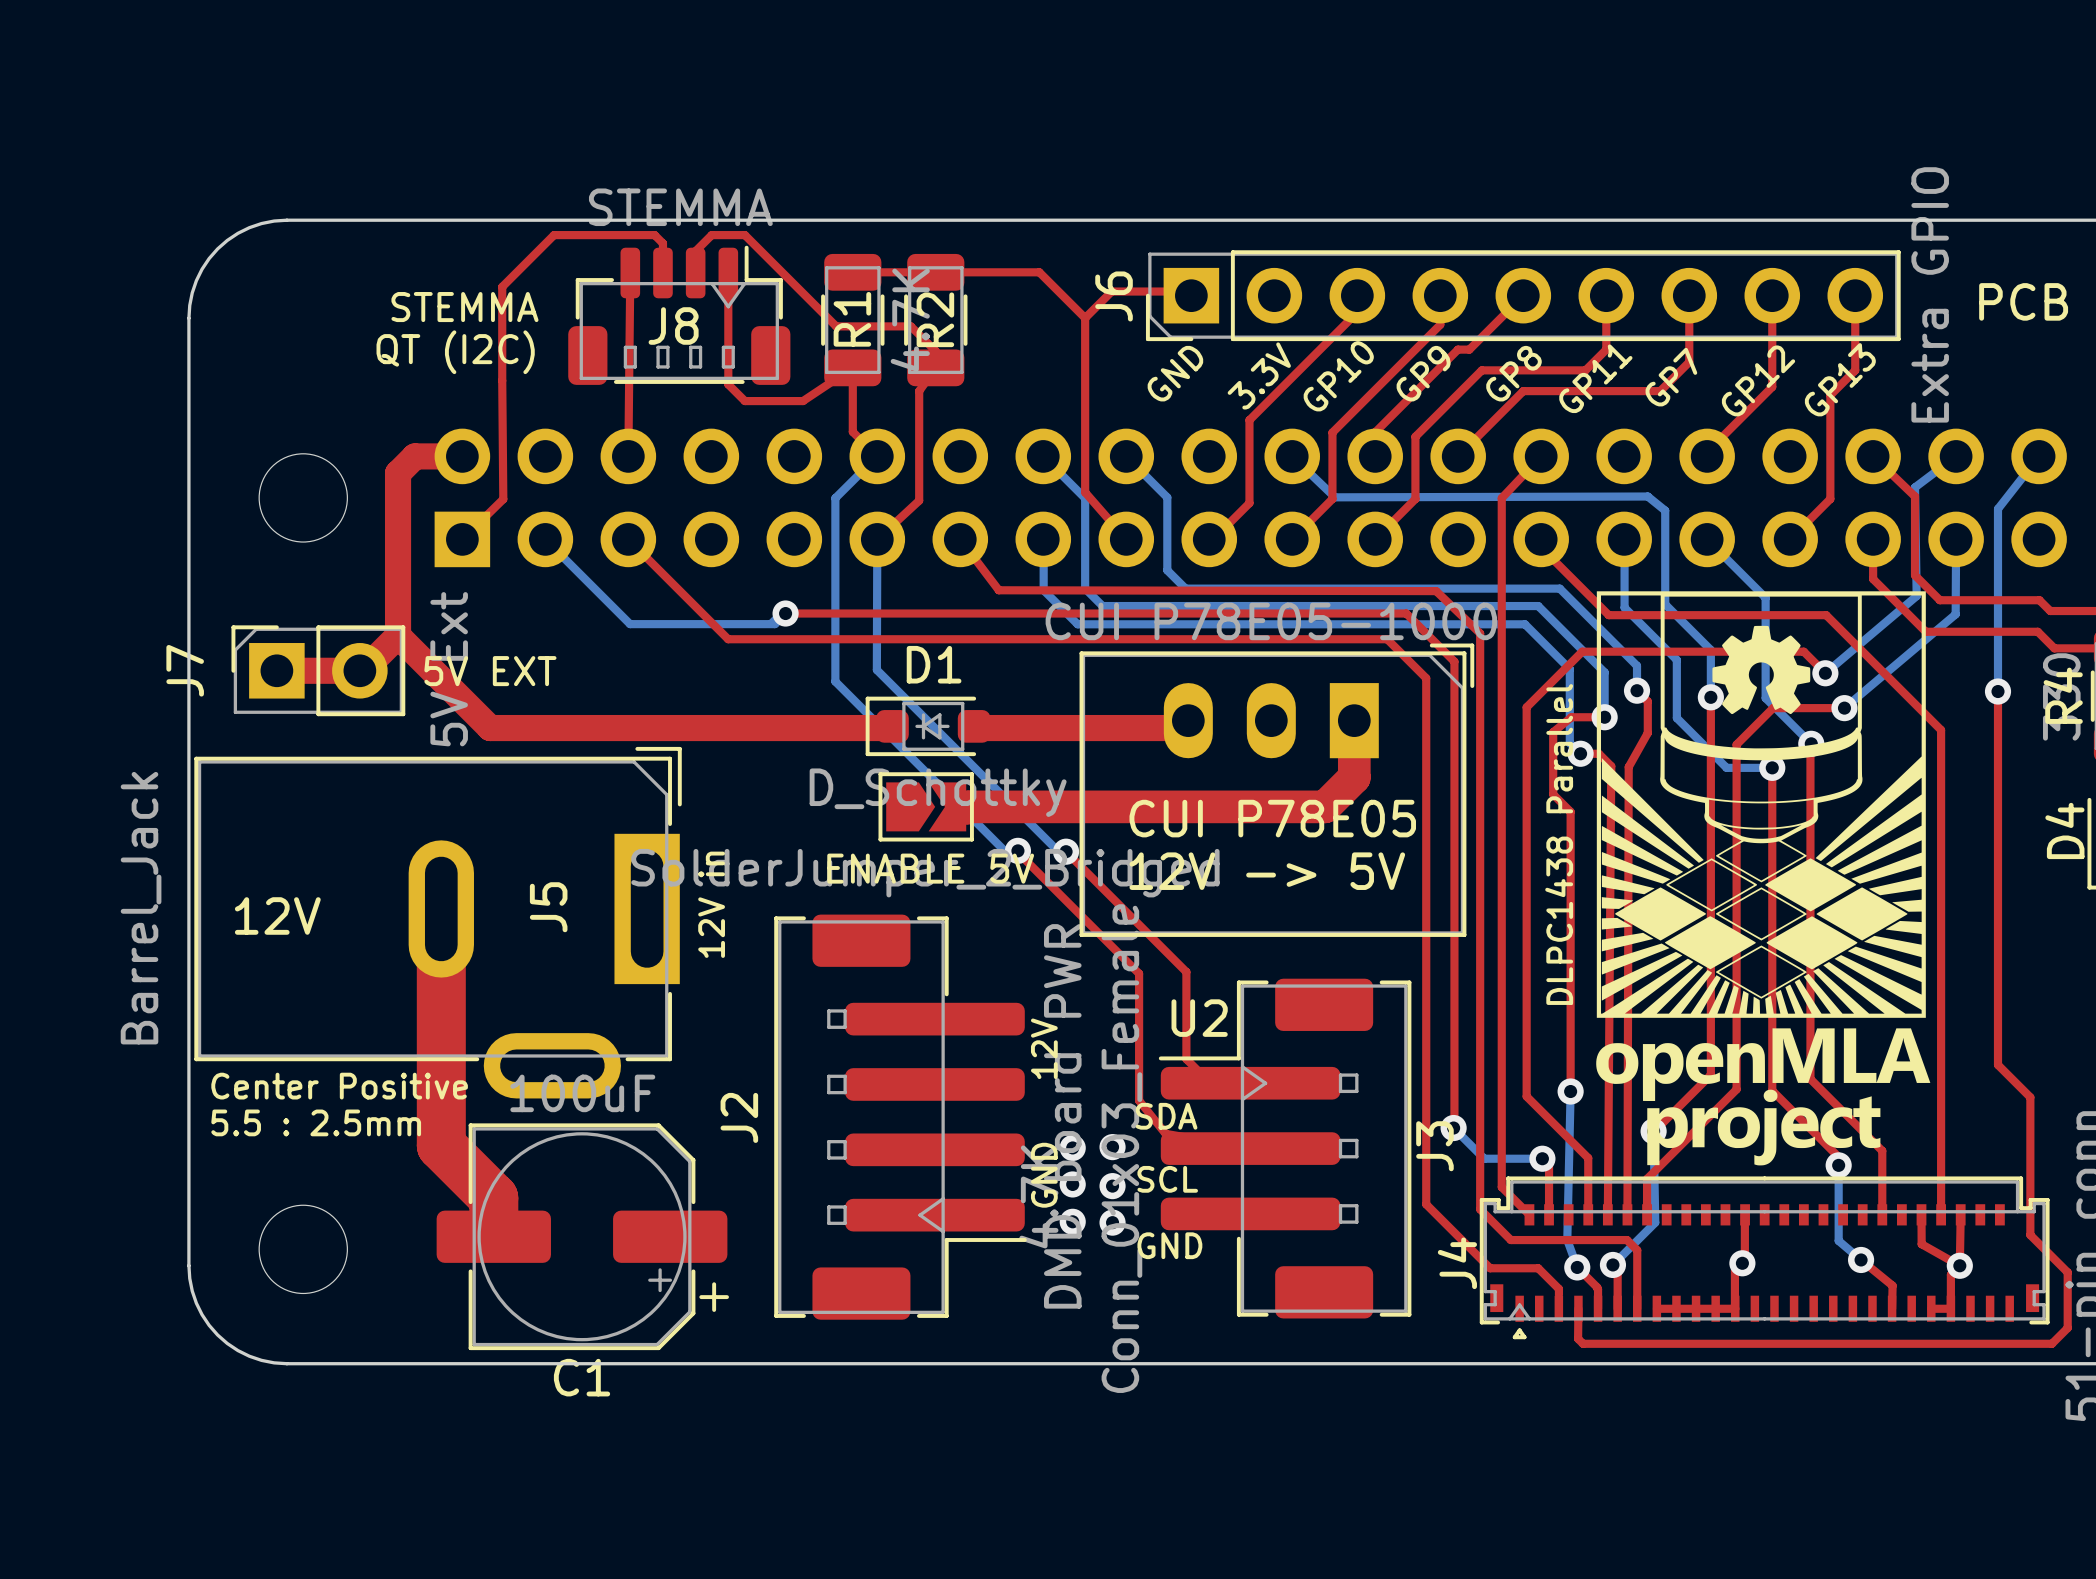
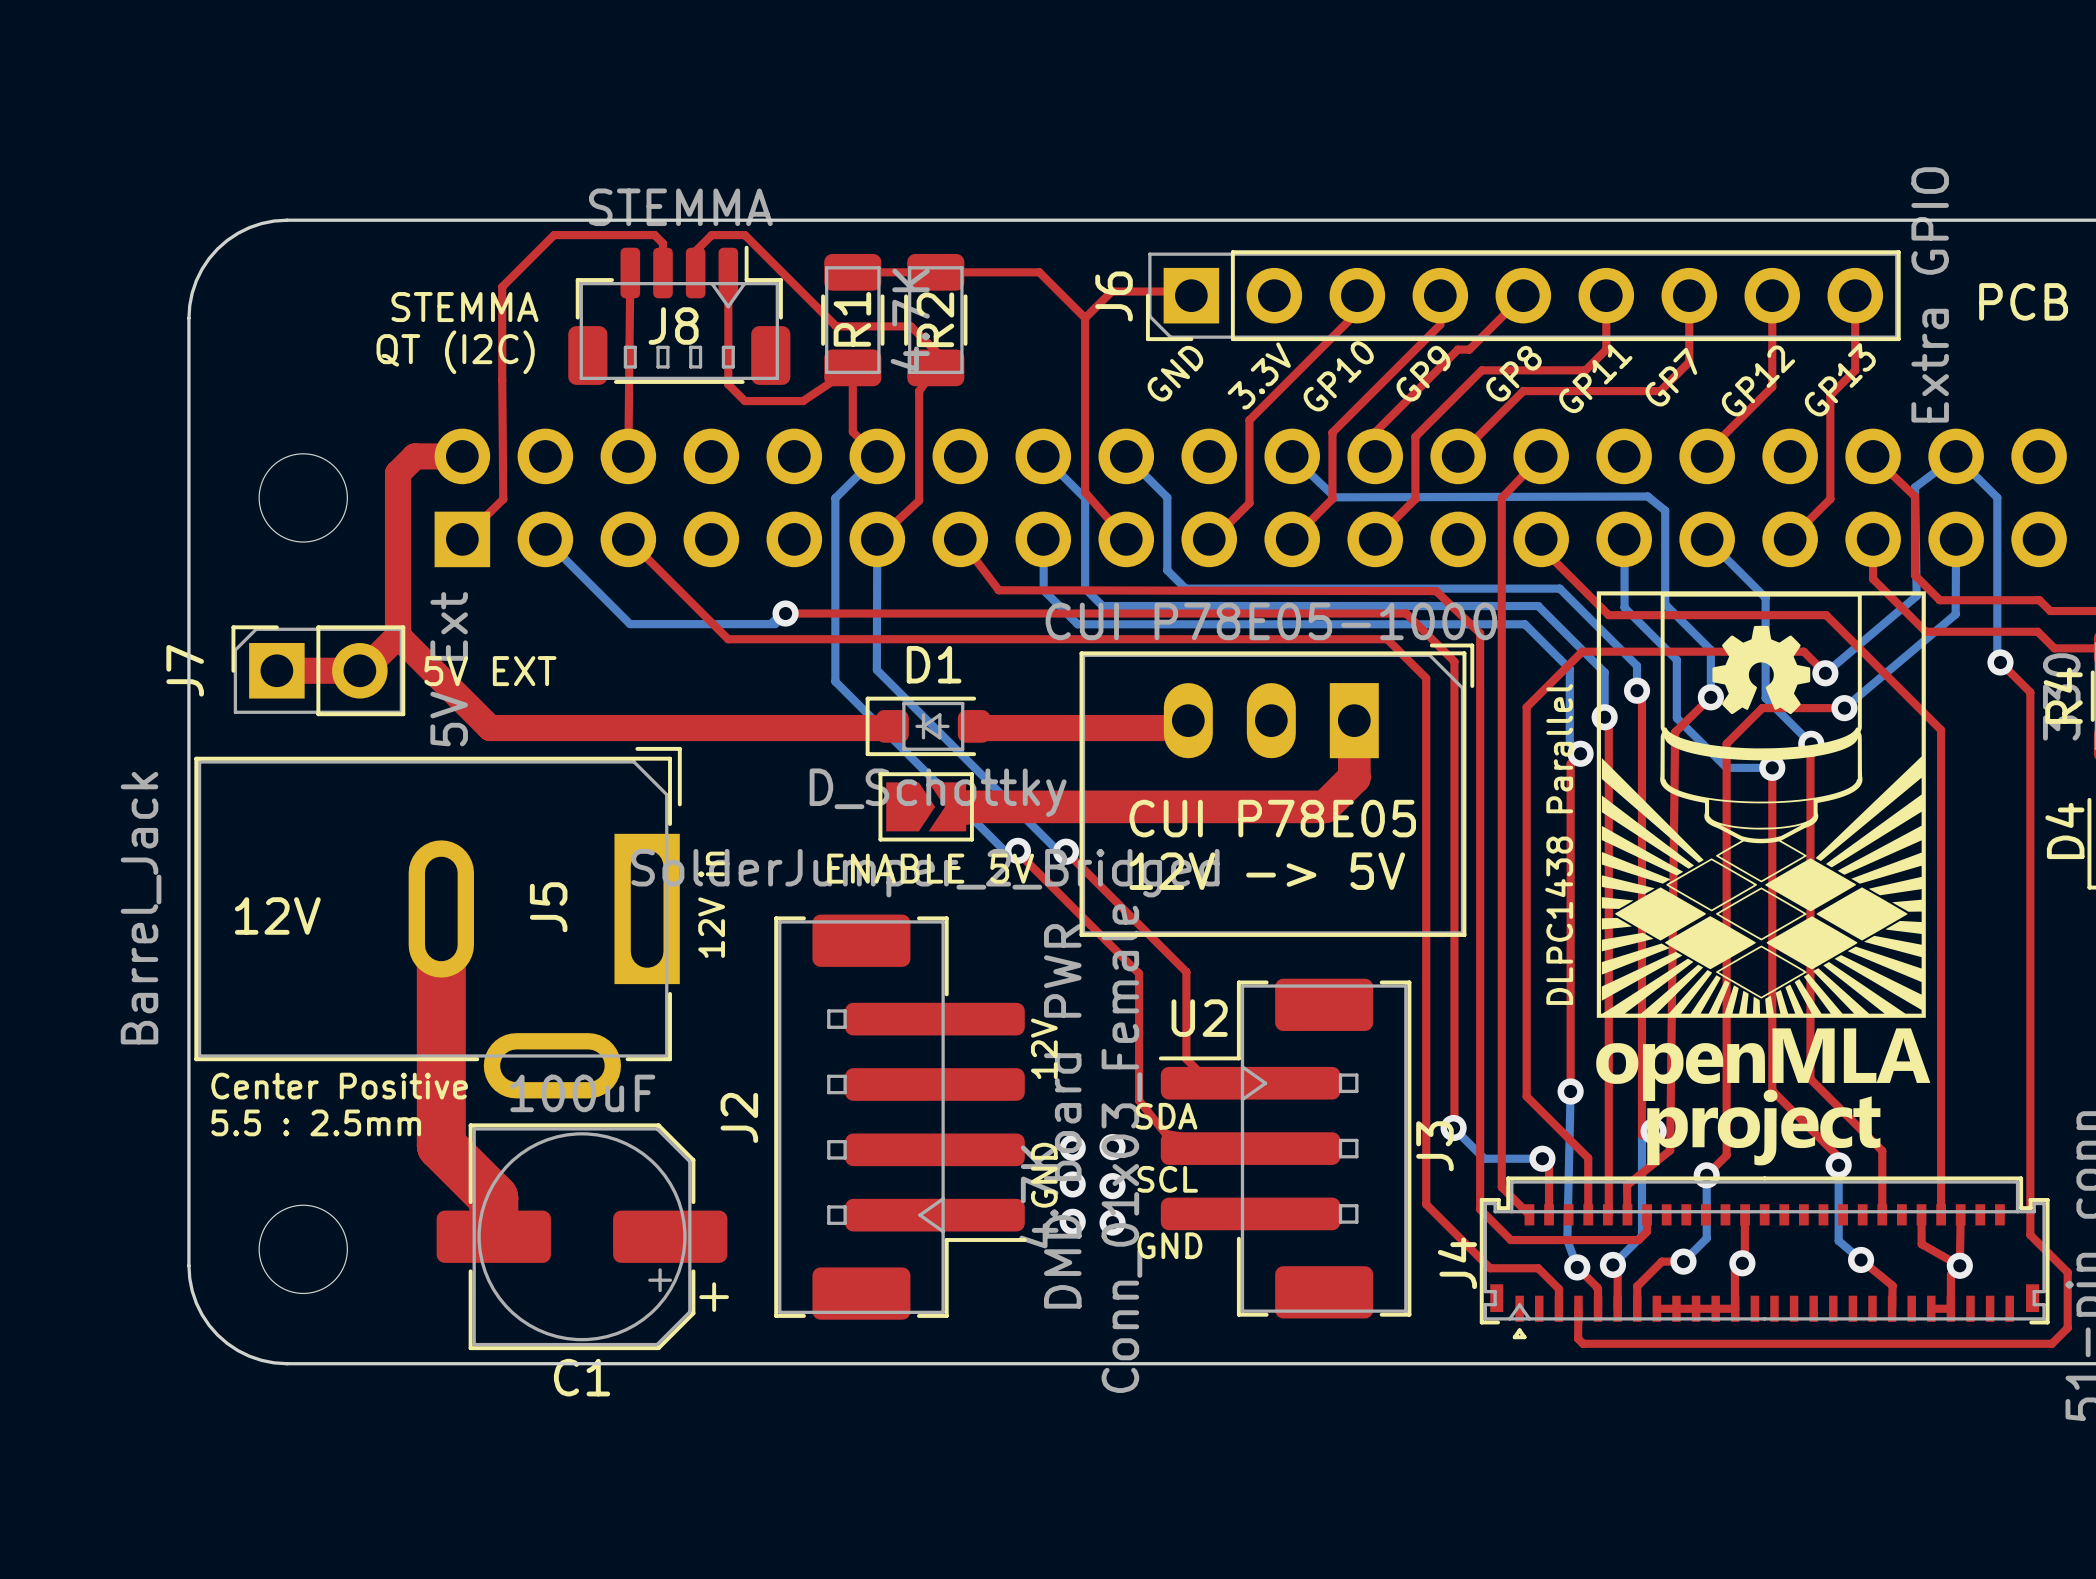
bottom track: none -> (1956, 456) (1997, 497) (1997, 659) (2000, 662)
bottom track: (2039, 456) (1998, 508) (1998, 691) -> none
top track: (1998, 691) (1998, 1064) (2030, 1097) -> (2000, 662) (2030, 692) (2030, 1097)
via position: (1998, 691) -> (2000, 662)
top track: (1641, 695) (1647, 701) (1647, 733) (1628, 767) (1627, 1214) -> (1710, 697) (1675, 732) (1670, 1150) (1627, 1185) (1627, 1214)
top track: none -> (1641, 695) (1641, 1135)
top track: (1710, 697) (1710, 1074) (1653, 1131) -> none
top track: (1773, 708) (1736, 744) (1736, 1089) (1647, 1178) (1647, 1214) -> (1773, 708) (1762, 708) (1726, 743) (1726, 1155) (1706, 1175)
top track: (1604, 717) (1571, 717) (1553, 732) (1553, 794) (1570, 811) -> (1580, 753) (1570, 763) (1570, 811)
top track: (1580, 753) (1598, 753) (1611, 766) (1607, 1214) -> (1604, 717) (1608, 721) (1607, 1214)
bottom track: (1653, 1131) (1655, 1222) (1641, 1235) -> (1641, 1135) (1641, 1235)
bottom track: none -> (1706, 1175) (1706, 1238) (1683, 1261)
via: none -> (1706, 1175)
top track: none -> (1647, 1214) (1647, 1231) (1638, 1240) (1627, 1240)
top track: (1627, 1240) (1637, 1250) (1637, 1286) -> (1683, 1261) (1661, 1261) (1637, 1286)
via: none -> (1683, 1261)

